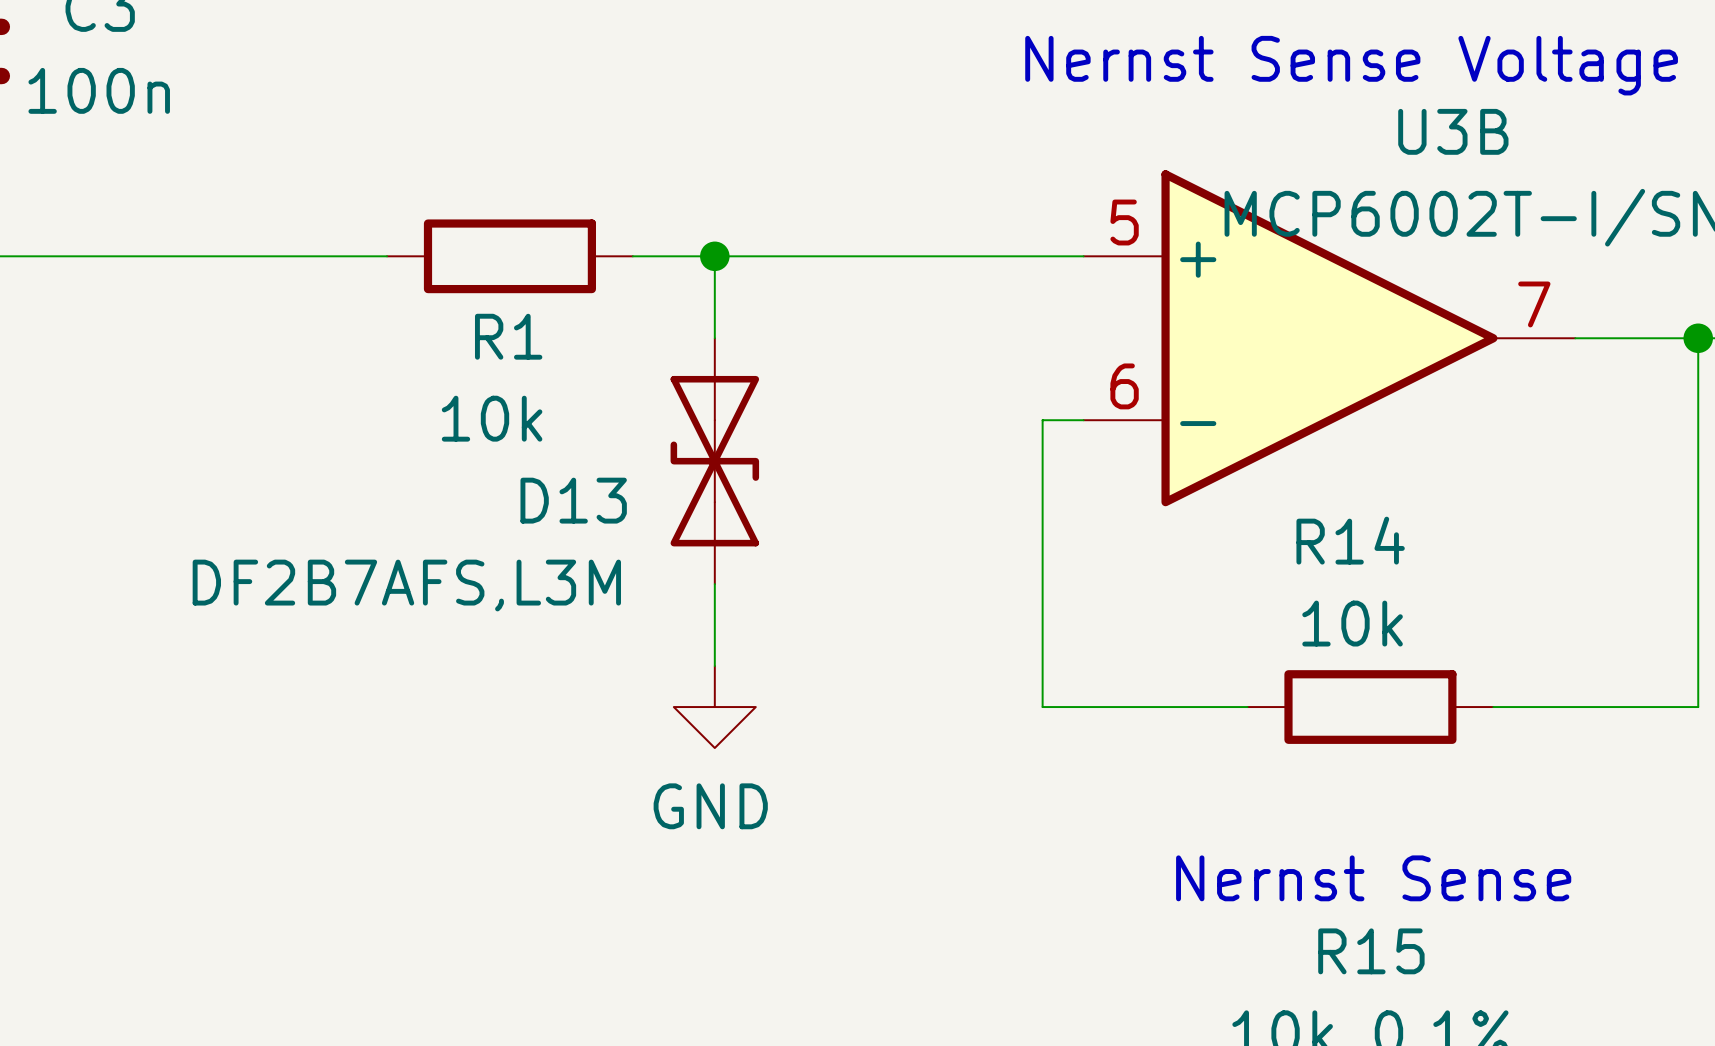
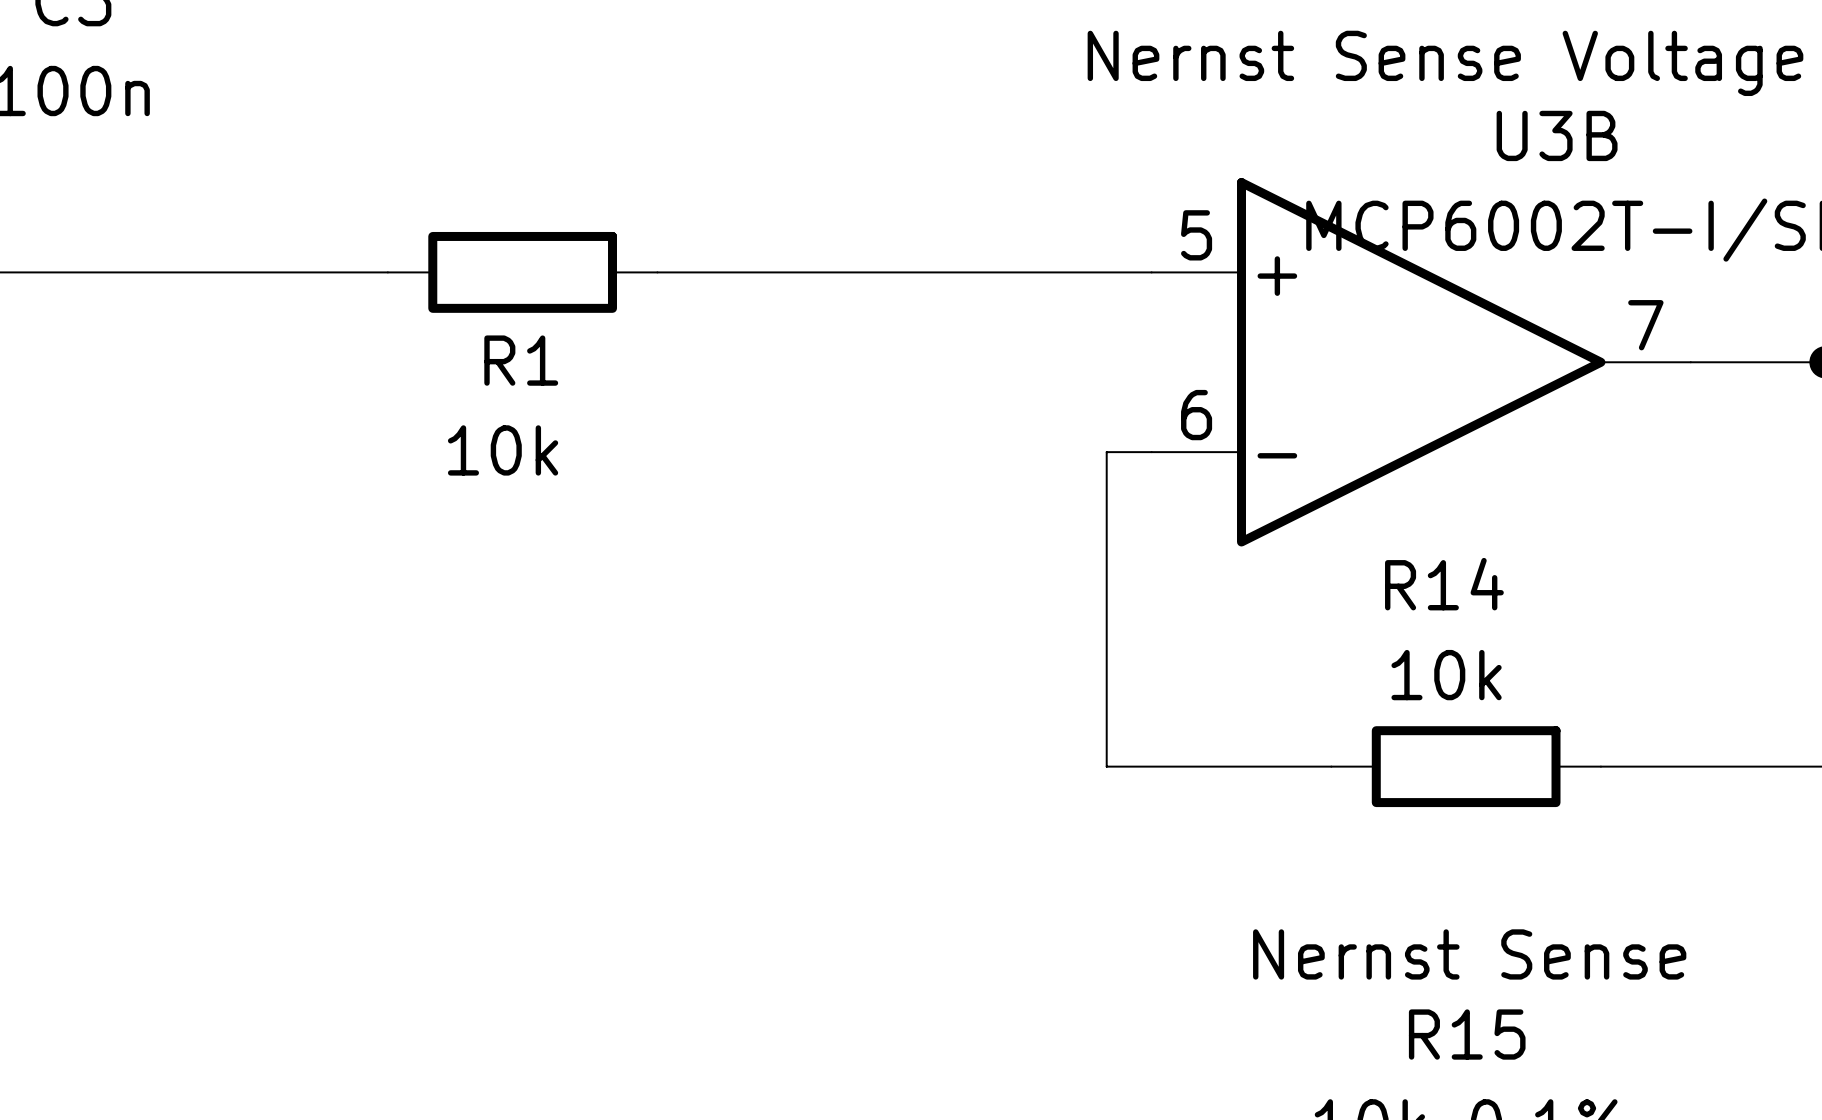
wire: (714, 256) (714, 338) -> none
junction: (714, 256) -> none
D13: DF2B7AFS,L3M (714, 461) -> none
wire: (714, 584) (714, 666) -> none
power symbol: GND (714, 707) -> none

